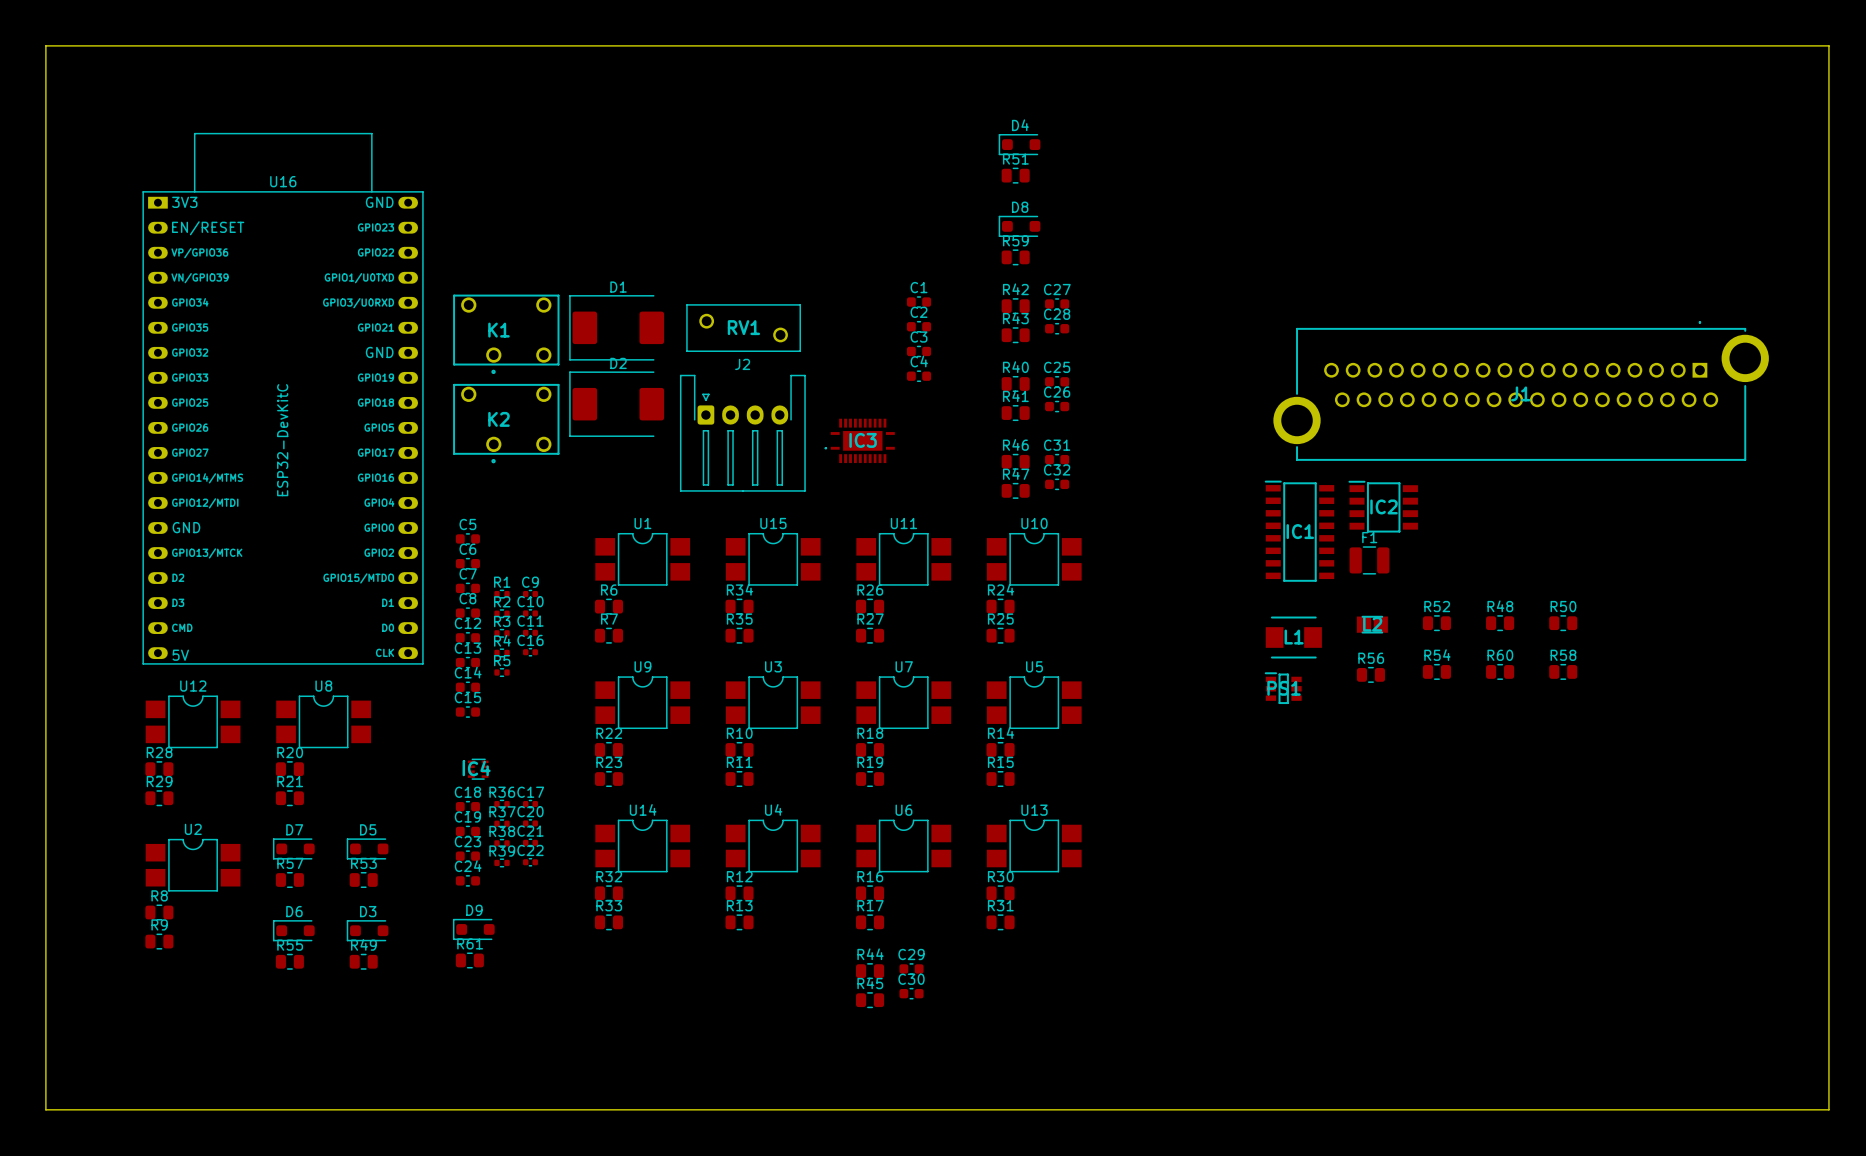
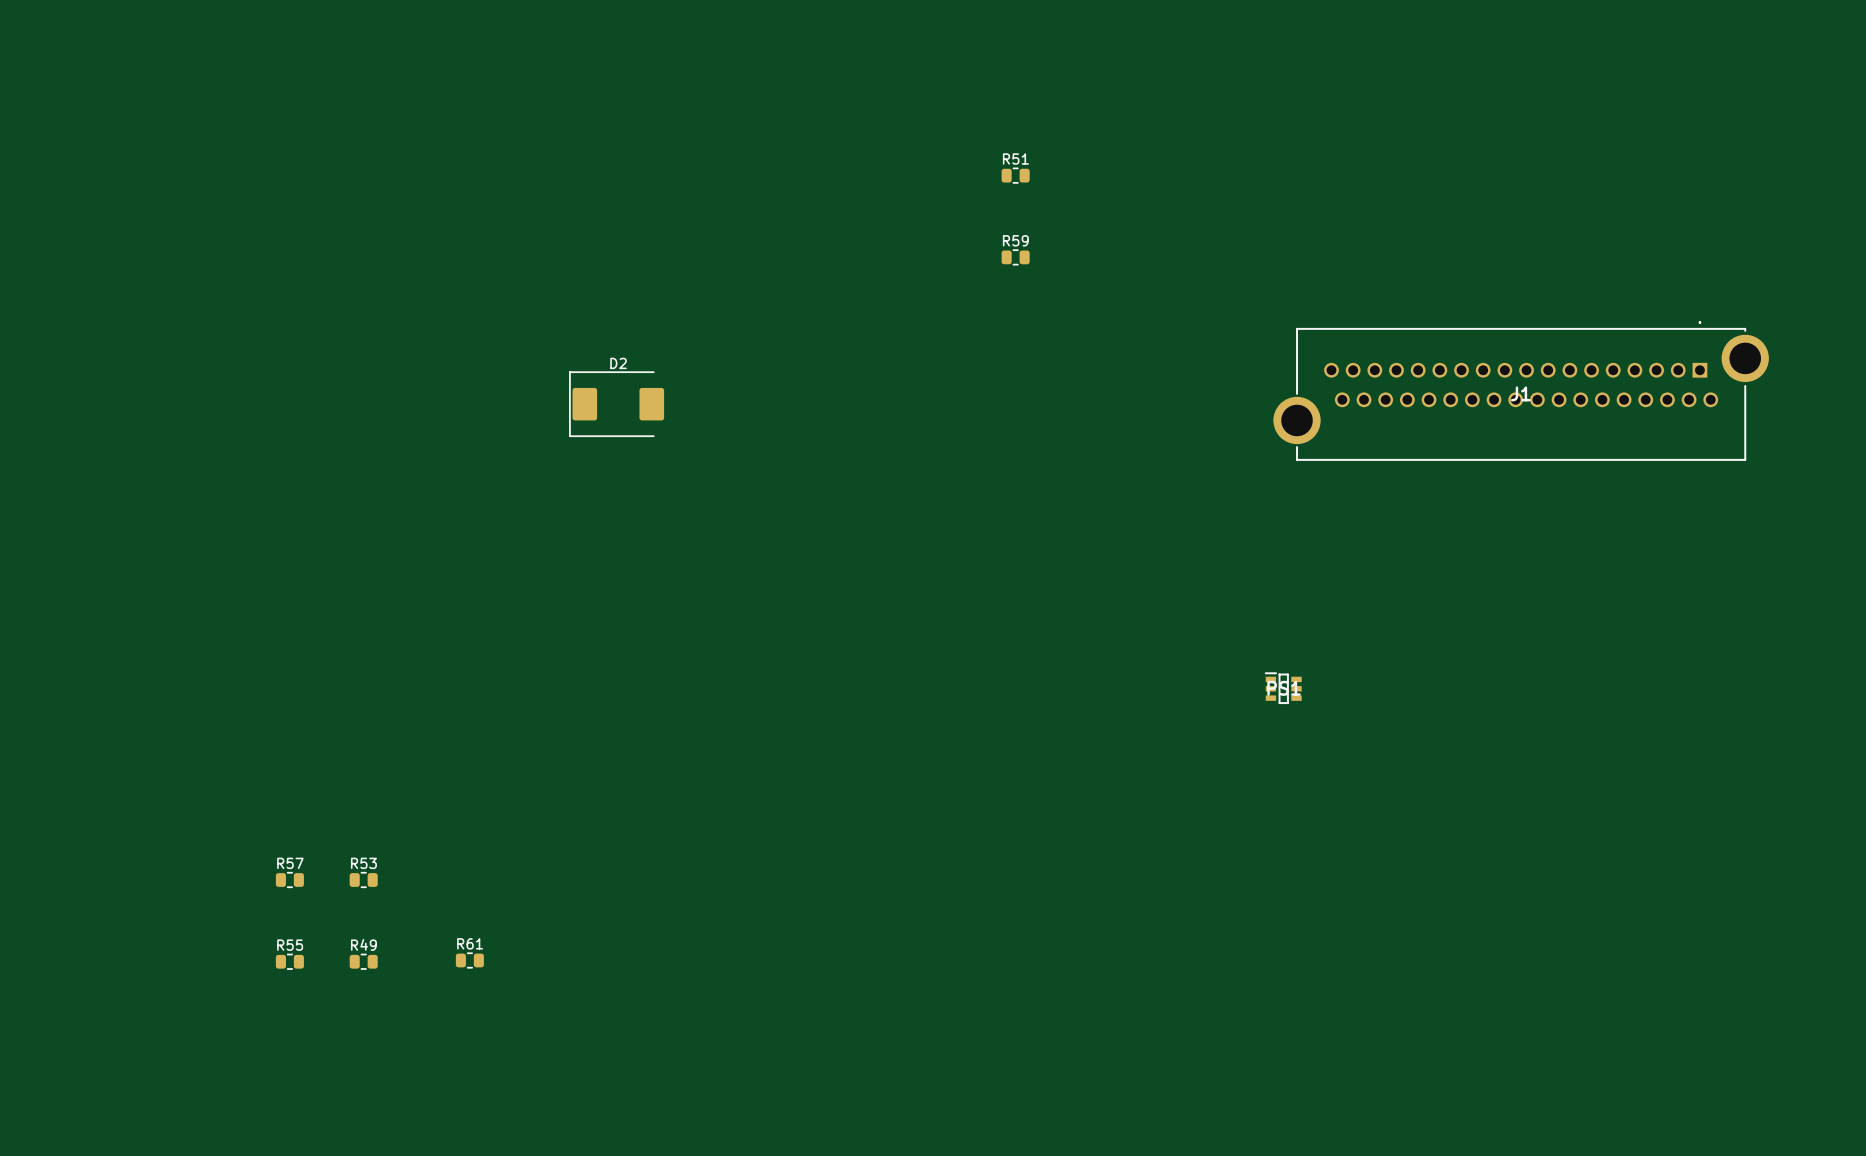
board edge: (45, 45) (1828, 45) (1828, 1109) (45, 1109) (45, 45) -> none
D4: (1019, 144) -> none
D8: (1019, 226) -> none
C1: (919, 302) -> none
C27: (1057, 303) -> none
R42: (1015, 306) -> none
C2: (919, 326) -> none
D1: (616, 327) -> none
RV1: (743, 328) -> none
C28: (1057, 328) -> none
K1: (506, 334) -> none
R43: (1015, 335) -> none
C3: (919, 351) -> none
C4: (919, 376) -> none
C25: (1057, 381) -> none
R40: (1015, 383) -> none
U16: ESP32-DevKitC (283, 398) -> none
C26: (1057, 406) -> none
R41: (1015, 413) -> none
K2: (506, 423) -> none
J2: (742, 433) -> none
IC3: (859, 440) -> none
C31: (1057, 459) -> none
R46: (1015, 461) -> none
C32: (1057, 484) -> none
R47: (1015, 490) -> none
IC2: (1383, 506) -> none
IC1: (1299, 531) -> none
C5: (467, 538) -> none
U1: (642, 559) -> none
U15: (773, 559) -> none
U11: (903, 559) -> none
U10: (1034, 559) -> none
F1: (1369, 560) -> none
C6: (467, 563) -> none
C7: (467, 588) -> none
R1: (502, 594) -> none
C9: (530, 594) -> none
R6: (608, 606) -> none
R34: (739, 606) -> none
R26: (870, 606) -> none
R24: (1000, 606) -> none
C8: (467, 613) -> none
R2: (502, 613) -> none
C10: (530, 613) -> none
R52: (1436, 623) -> none
R48: (1500, 623) -> none
R50: (1563, 623) -> none
L2: (1372, 624) -> none
C11: (530, 632) -> none
R3: (502, 633) -> none
R7: (608, 635) -> none
R35: (739, 635) -> none
R27: (870, 635) -> none
R25: (1000, 635) -> none
C12: (467, 637) -> none
L1: (1293, 637) -> none
R4: (502, 652) -> none
C16: (530, 652) -> none
C13: (467, 662) -> none
R54: (1436, 671) -> none
R60: (1500, 671) -> none
R58: (1563, 671) -> none
R5: (502, 672) -> none
R56: (1370, 674) -> none
C14: (467, 687) -> none
U9: (642, 702) -> none
U3: (773, 702) -> none
U7: (903, 702) -> none
U5: (1034, 702) -> none
C15: (467, 712) -> none
U12: (193, 721) -> none
U8: (323, 721) -> none
R22: (608, 749) -> none
R10: (739, 749) -> none
R18: (870, 749) -> none
R14: (1000, 749) -> none
R28: (159, 769) -> none
R20: (289, 769) -> none
IC4: (475, 769) -> none
R23: (608, 779) -> none
R11: (739, 779) -> none
R19: (870, 779) -> none
R15: (1000, 779) -> none
R29: (159, 798) -> none
R21: (289, 798) -> none
R36: (502, 804) -> none
C17: (530, 804) -> none
C18: (467, 806) -> none
R37: (502, 823) -> none
C20: (530, 823) -> none
C19: (467, 831) -> none
C21: (530, 842) -> none
R38: (502, 843) -> none
U14: (642, 846) -> none
U4: (773, 846) -> none
U6: (903, 846) -> none
U13: (1034, 846) -> none
D7: (293, 848) -> none
D5: (367, 848) -> none
C23: (467, 856) -> none
R39: (502, 862) -> none
C22: (530, 862) -> none
U2: (193, 865) -> none
C24: (467, 880) -> none
R32: (608, 893) -> none
R12: (739, 893) -> none
R16: (870, 893) -> none
R30: (1000, 893) -> none
R8: (159, 912) -> none
R33: (608, 922) -> none
R13: (739, 922) -> none
R17: (870, 922) -> none
R31: (1000, 922) -> none
D9: (473, 929) -> none
D6: (293, 930) -> none
D3: (367, 930) -> none
R9: (159, 941) -> none
C29: (911, 968) -> none
R44: (870, 971) -> none
C30: (911, 993) -> none
R45: (870, 1000) -> none

